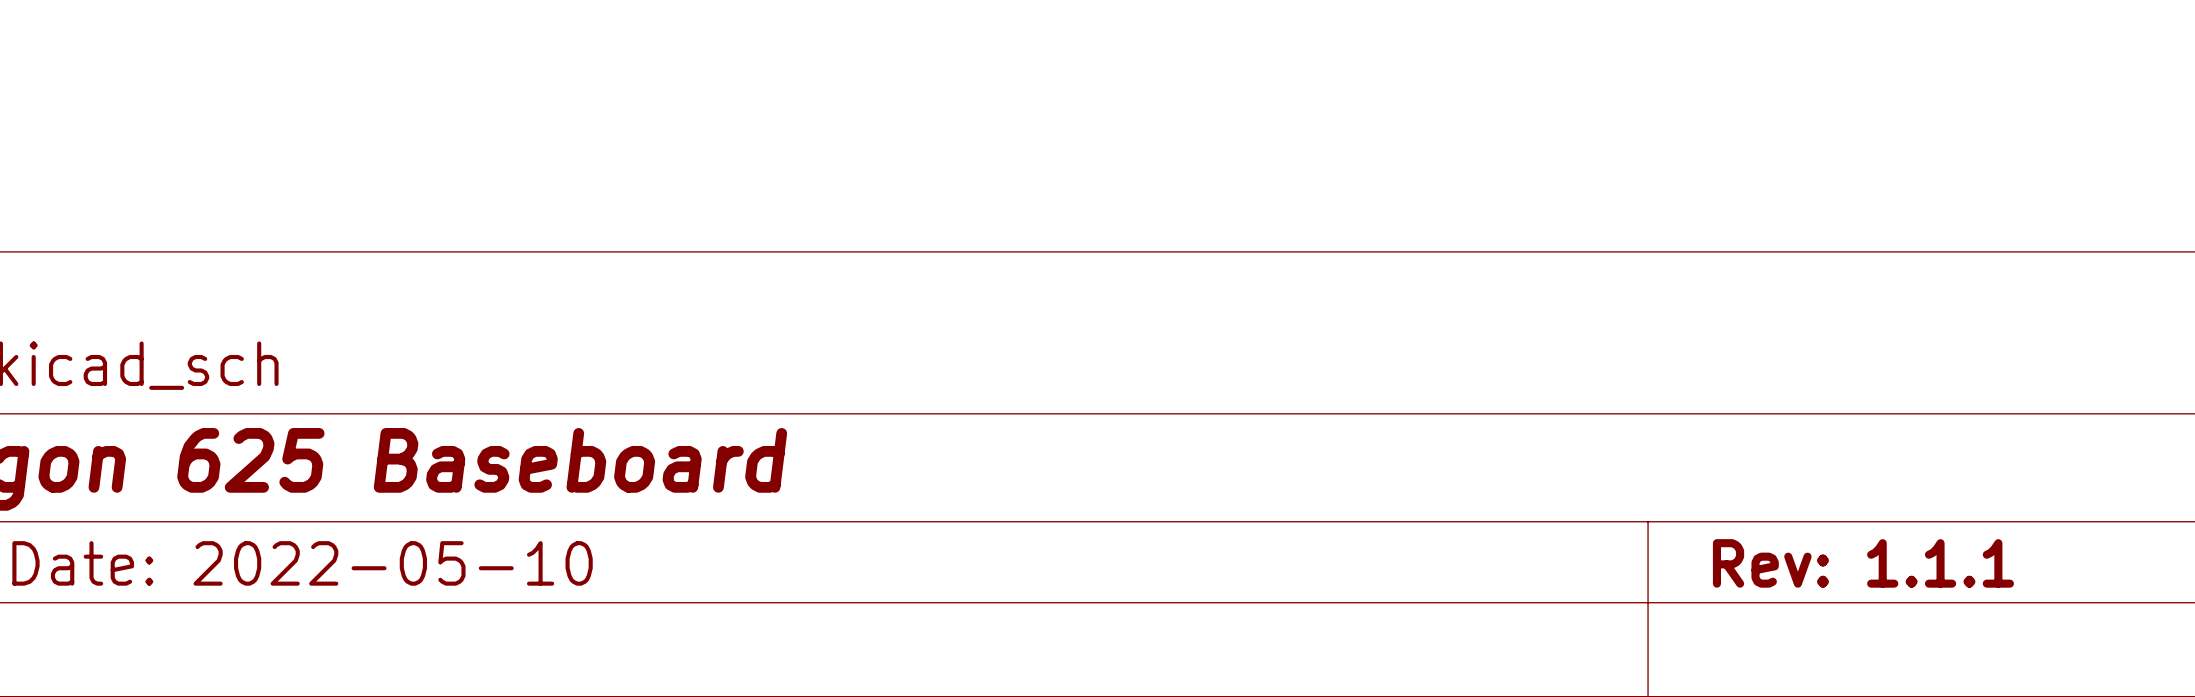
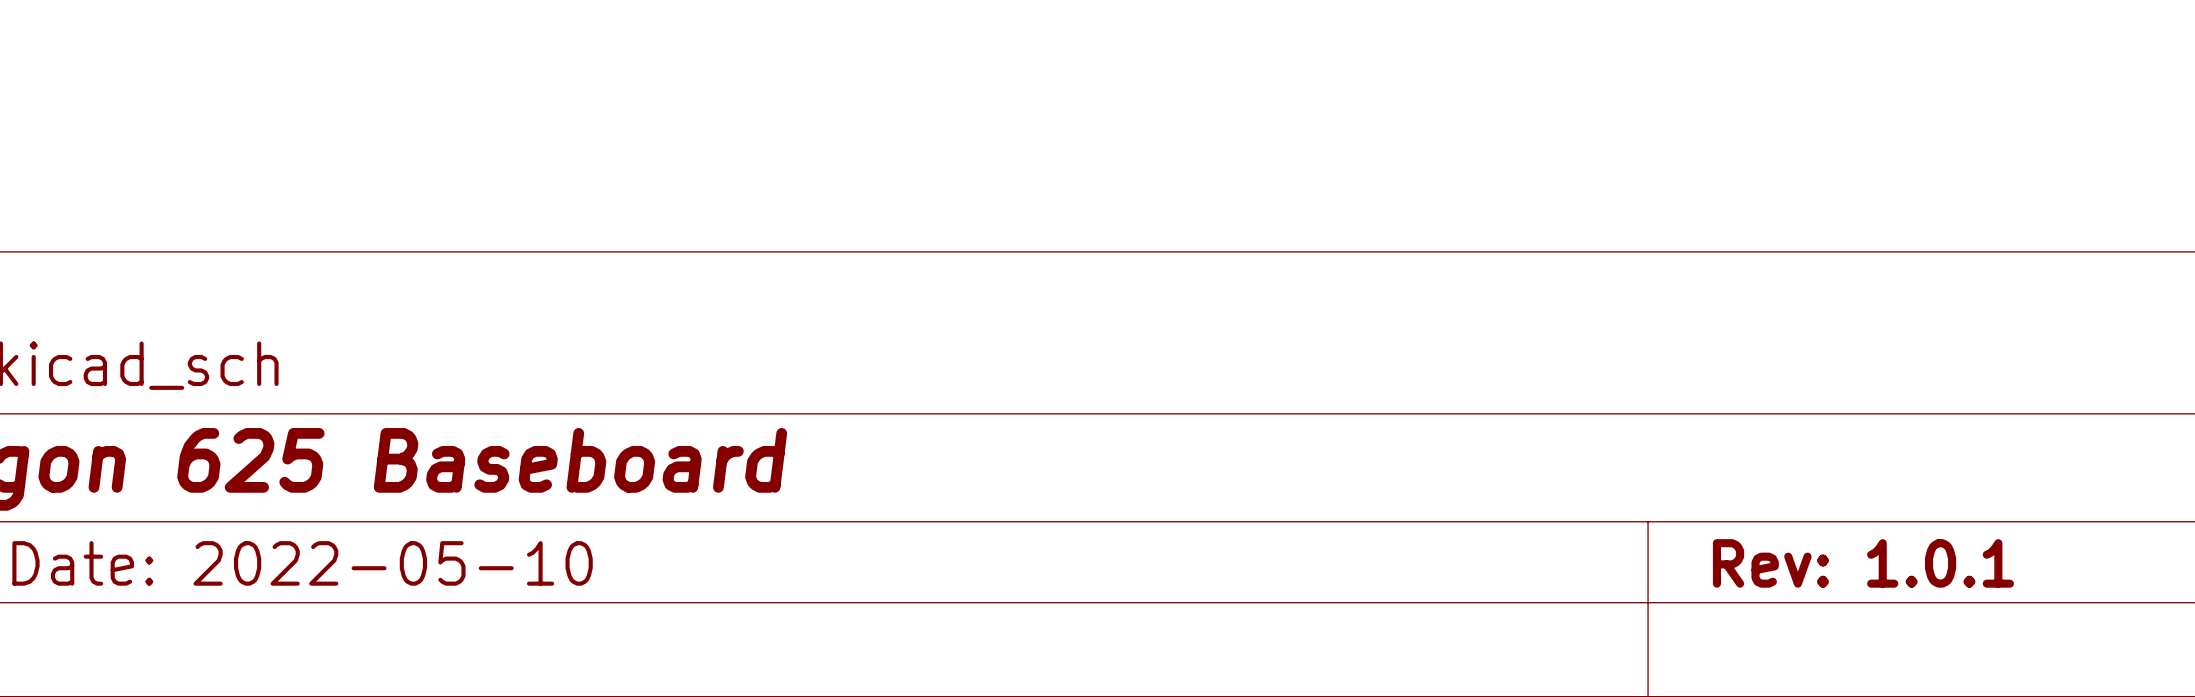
title block: Rev: 1.1.1 (1863, 563) -> Rev: 1.0.1 (1863, 563)

